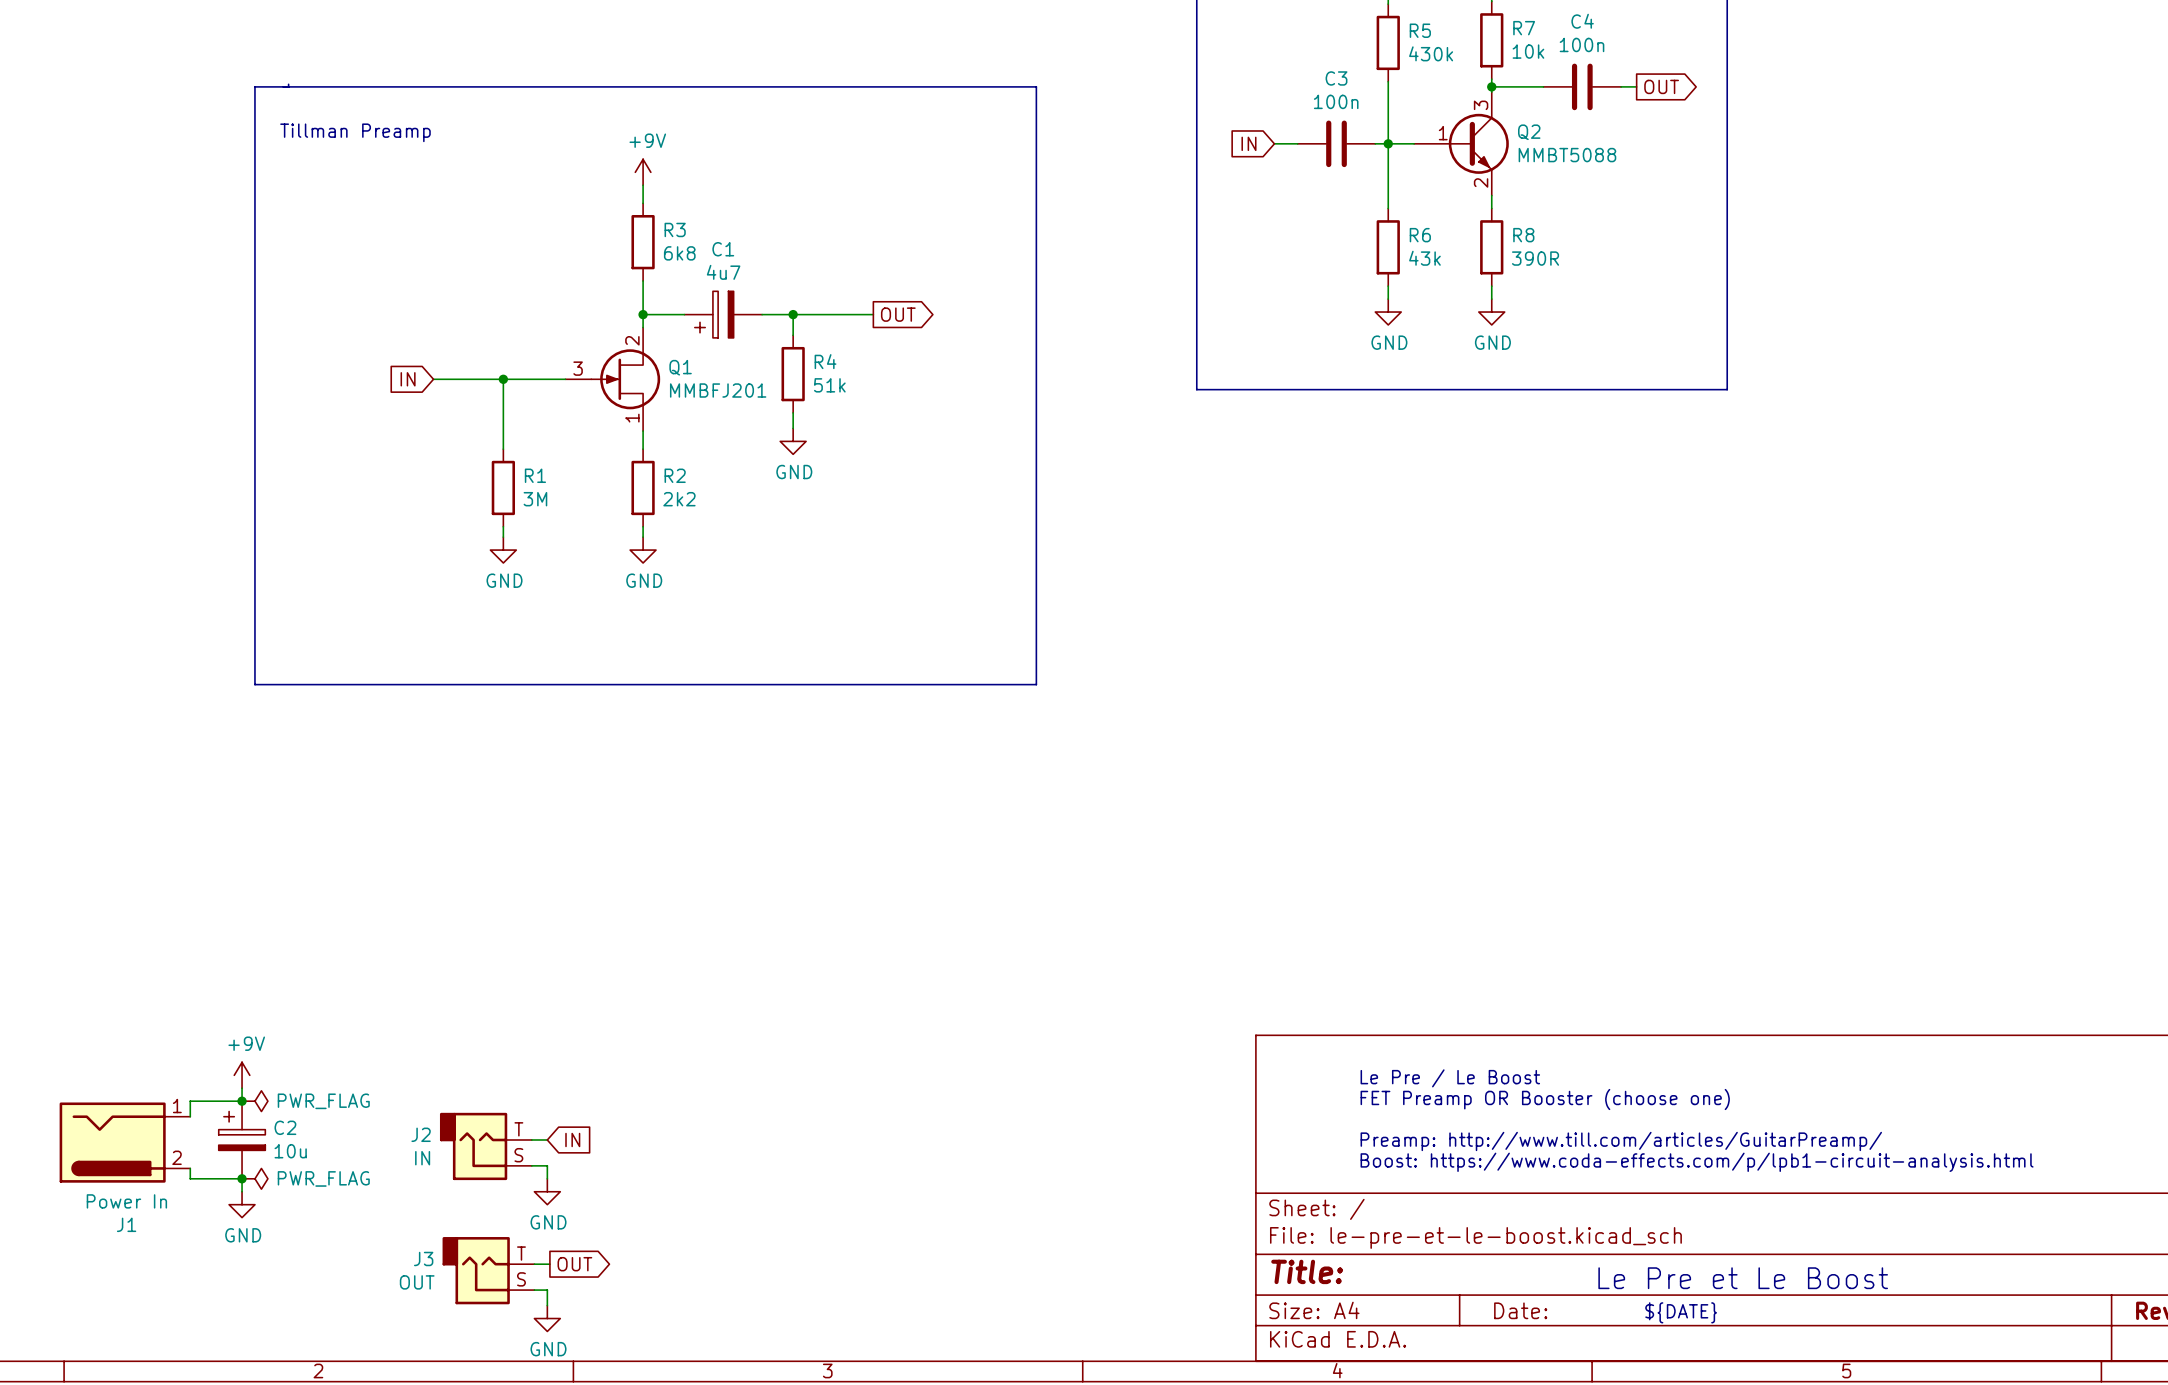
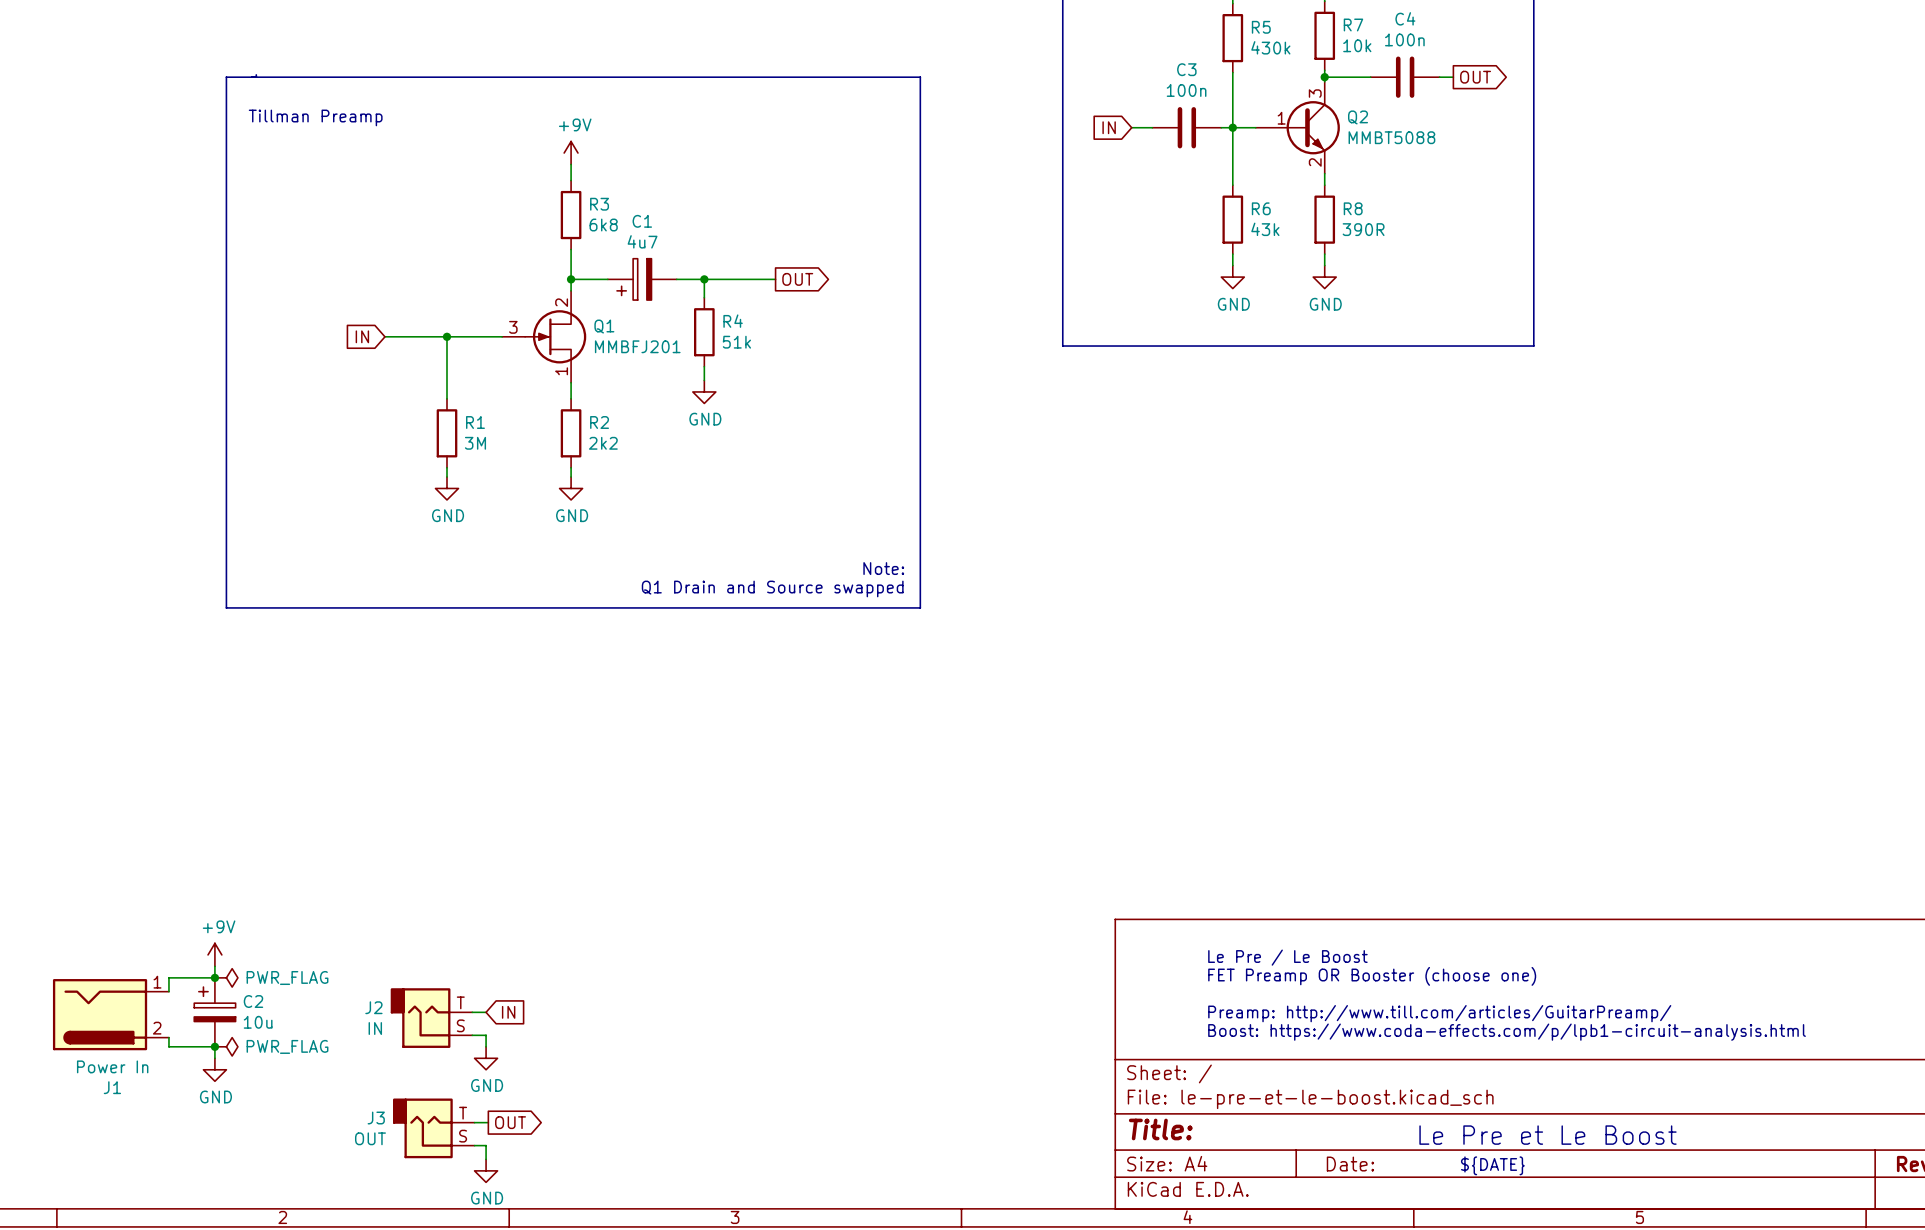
text: none -> Note: (883, 568)
text: none -> Q1 Drain and Source swapped (772, 588)

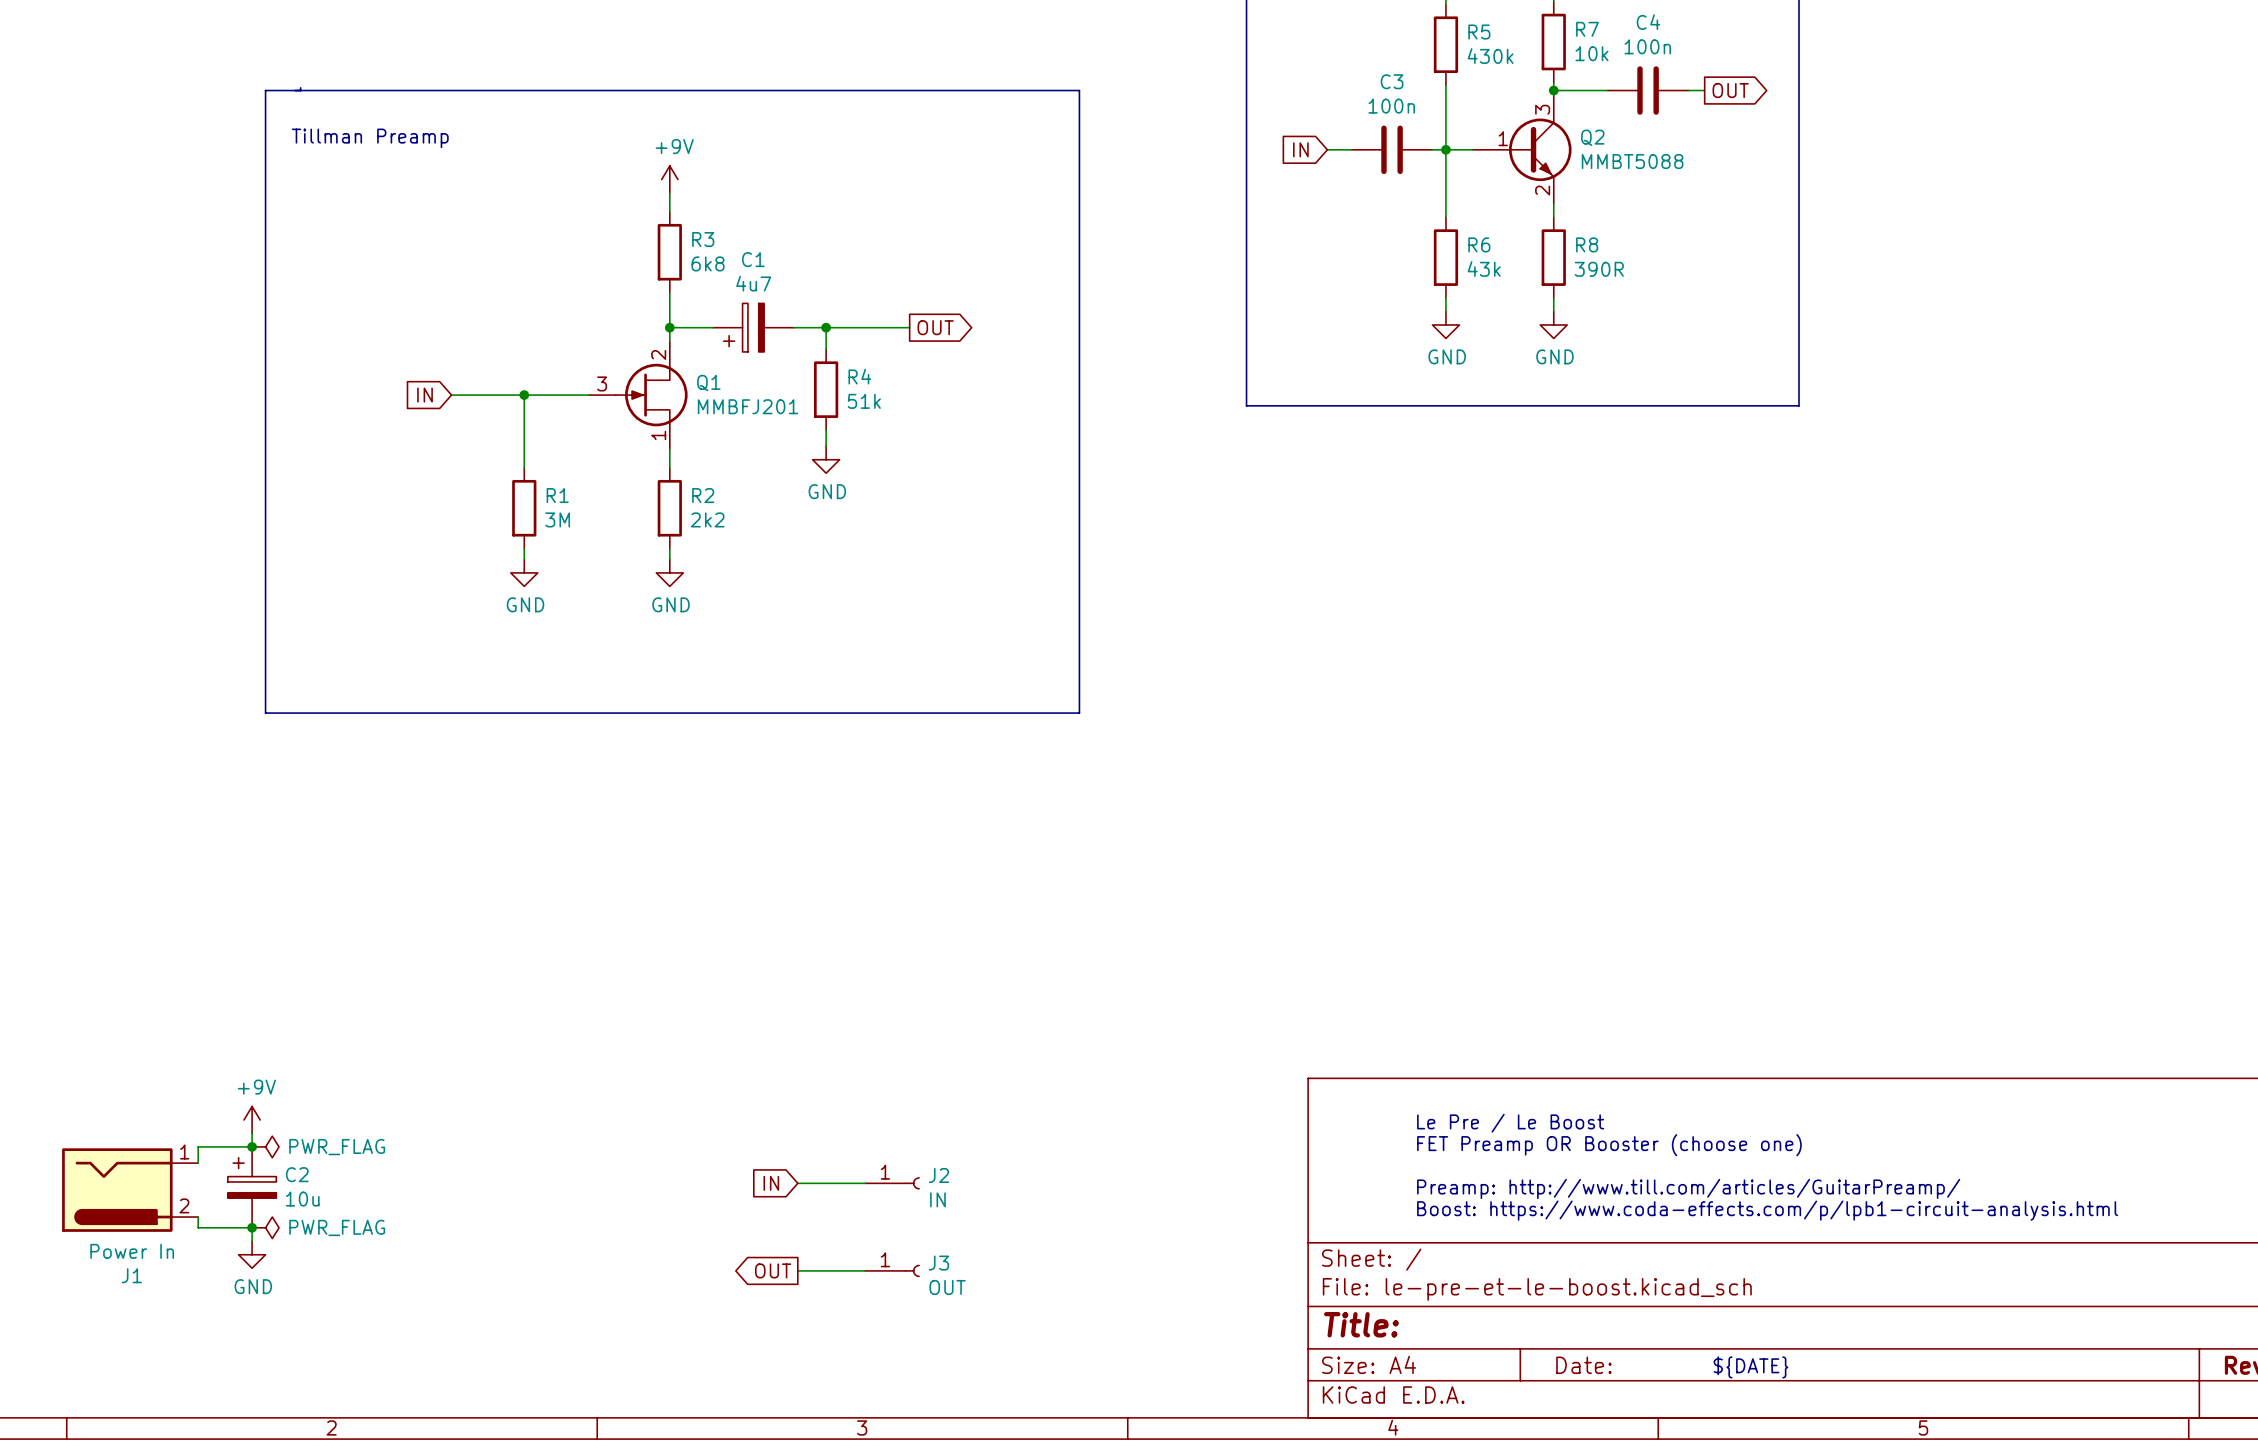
text: Note: (883, 568) -> none
text: Q1 Drain and Source swapped (772, 588) -> none
J2 symbol: [390, 988, 473, 1048] -> [865, 1177, 920, 1190]
J2 name position: J2 (373, 1007) -> J2 (938, 1175)
wire: none -> (797, 1183) (865, 1183)
wire: (472, 1012) (486, 1012) -> none
global label rotation: 0° (508, 1012) -> 180° (771, 1183)
global label position: IN (508, 1012) -> IN (771, 1183)
J2 value position: IN (375, 1028) -> IN (937, 1199)
wire: (472, 1035) (486, 1035) (486, 1046) -> none
power symbol: GND (486, 1058) -> none
wire: none -> (797, 1270) (865, 1270)
J3 symbol: [393, 1098, 475, 1159] -> [865, 1264, 920, 1278]
J3 name position: J3 (376, 1118) -> J3 (938, 1263)
wire: (474, 1122) (488, 1122) -> none
global label rotation: 0° (510, 1122) -> 180° (773, 1270)
global label position: OUT (510, 1122) -> OUT (773, 1270)
text: Le Pre et Le Boost (1547, 1135) -> none
J3 value position: OUT (370, 1138) -> OUT (947, 1287)
wire: (474, 1145) (486, 1145) (486, 1159) -> none
power symbol: GND (486, 1170) -> none

